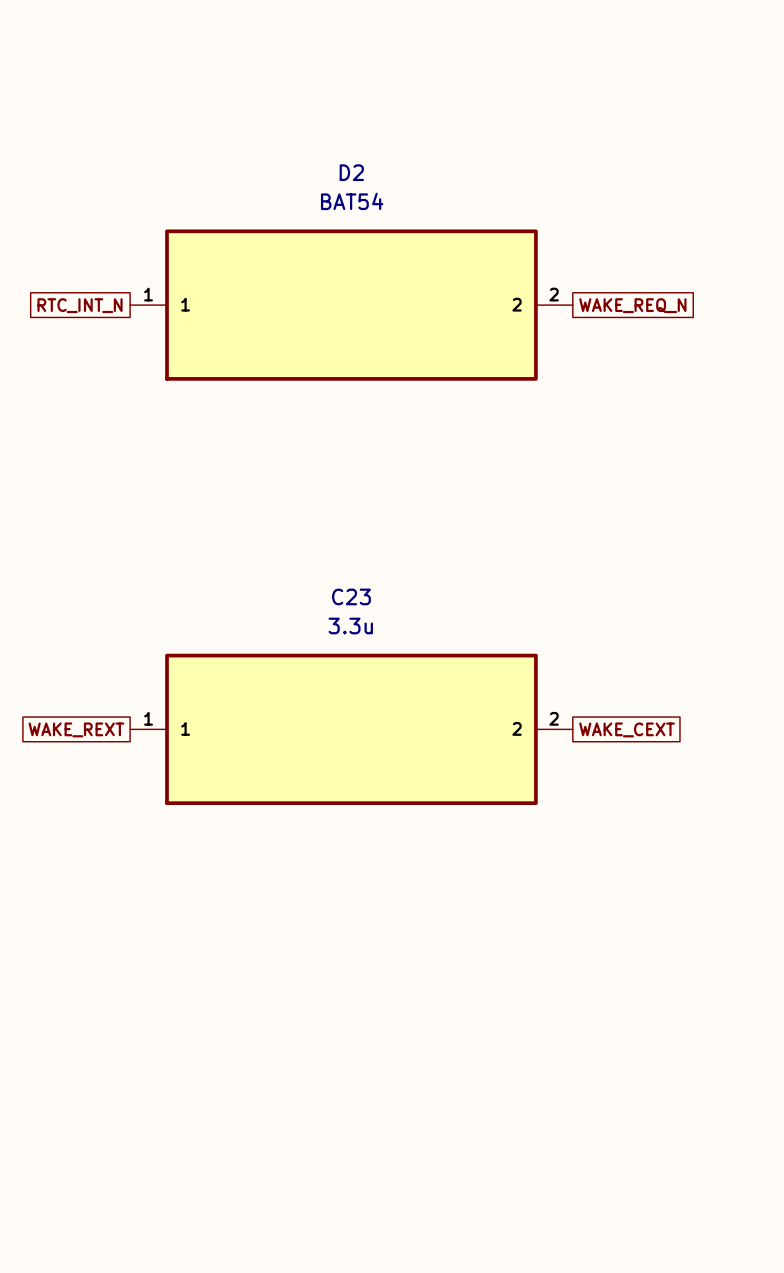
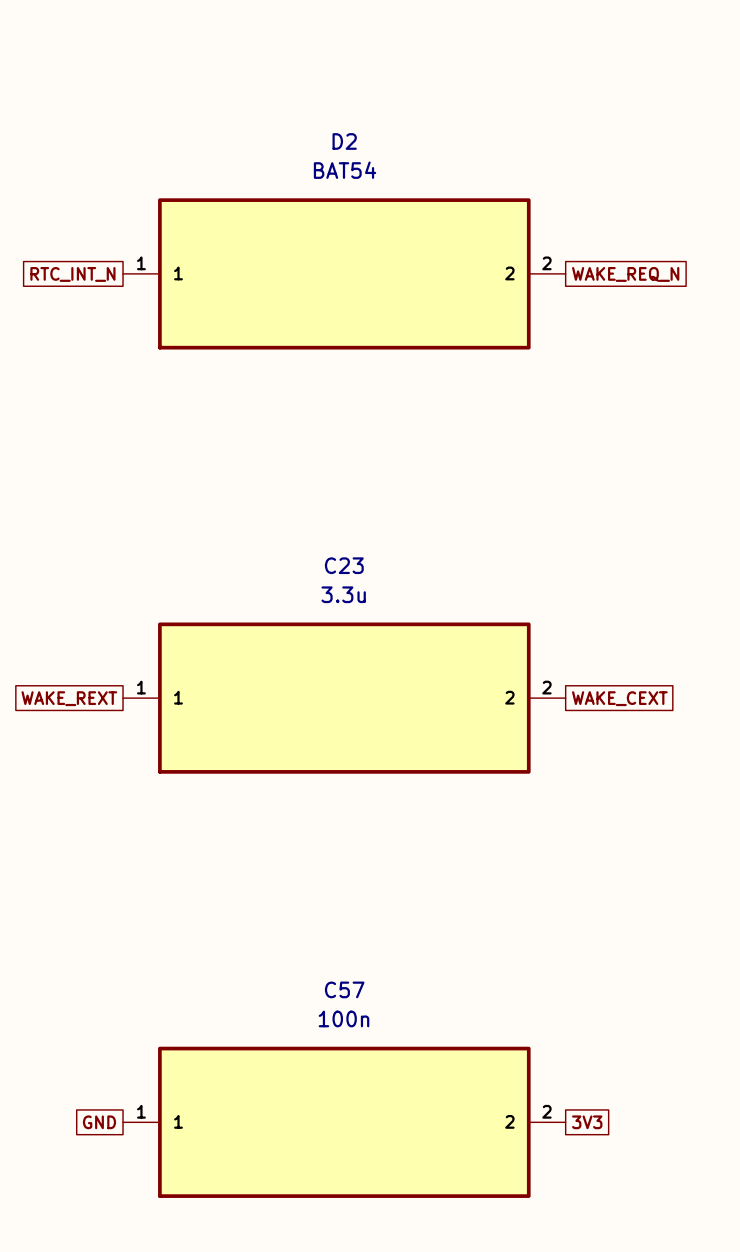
global label: none -> GND (99, 1122)
C57: none -> 100n (344, 1122)
global label: none -> 3V3 (587, 1122)

